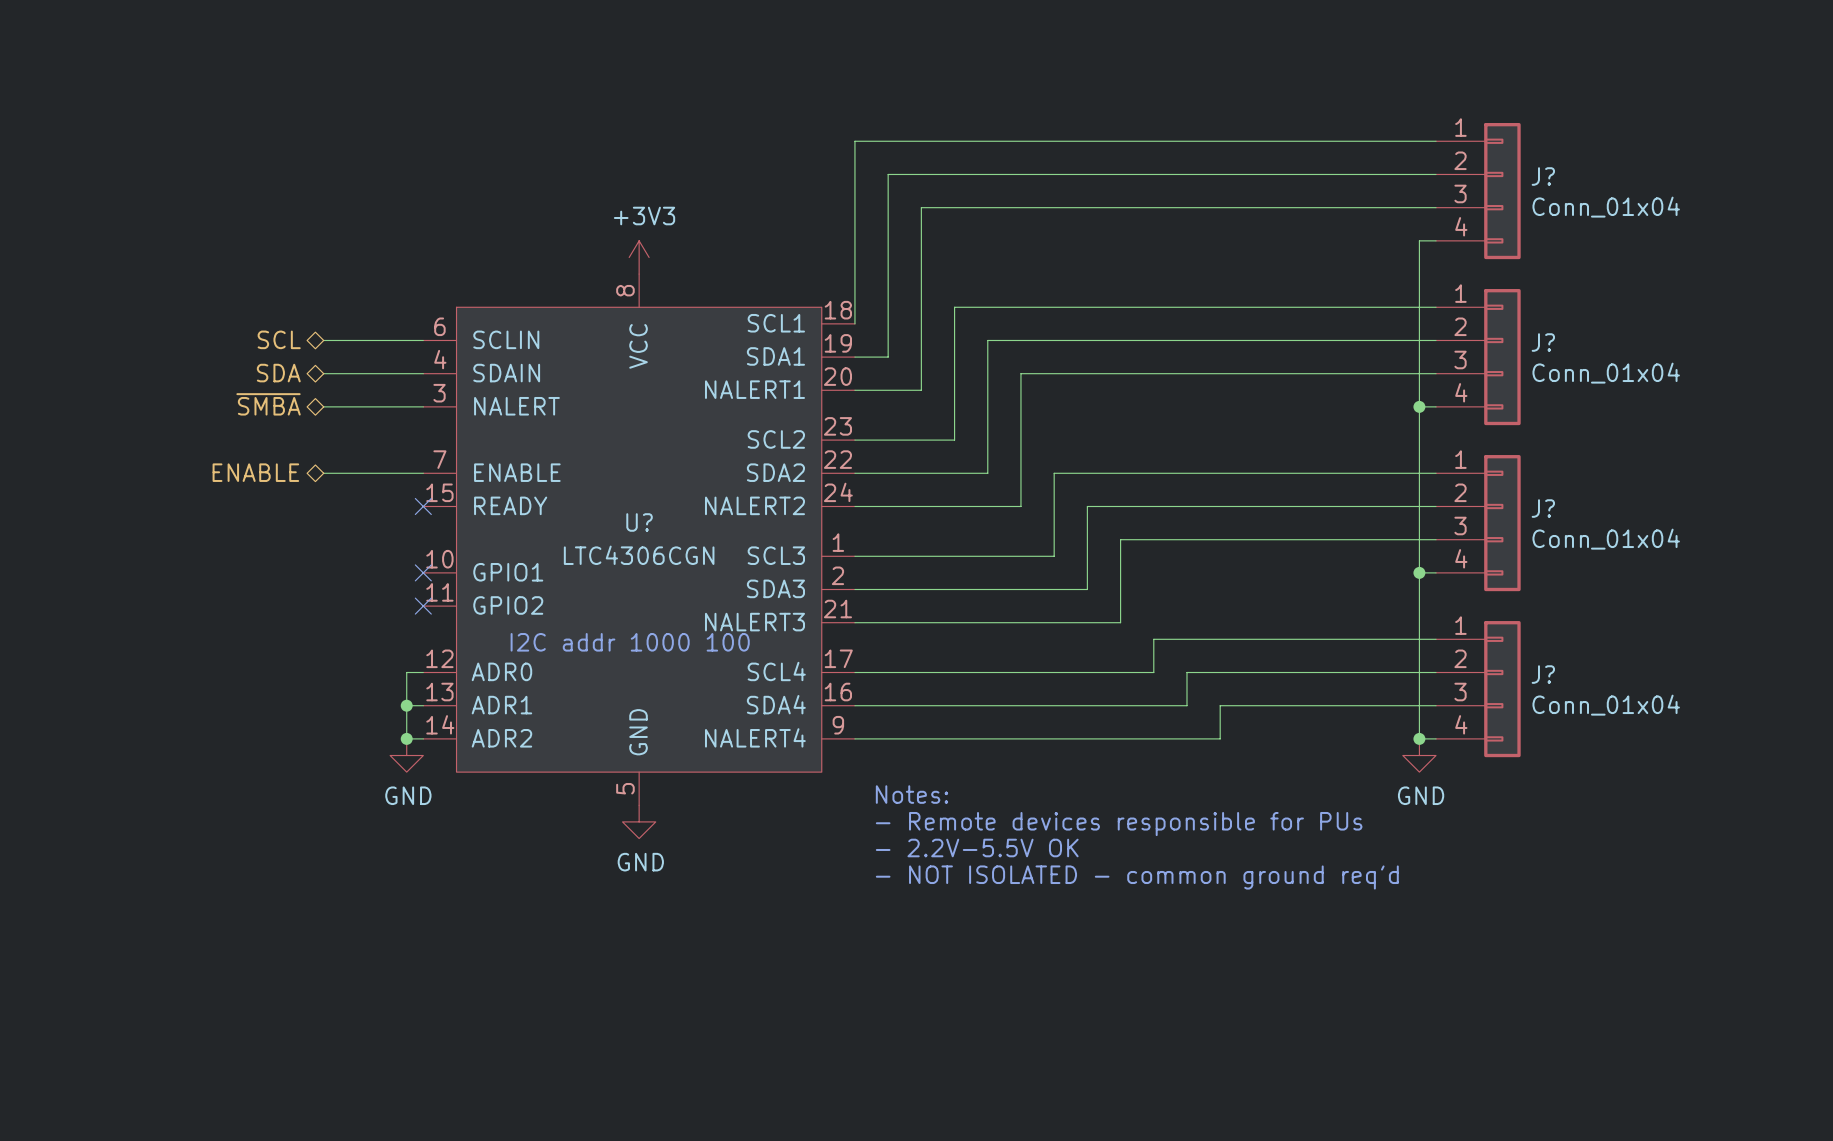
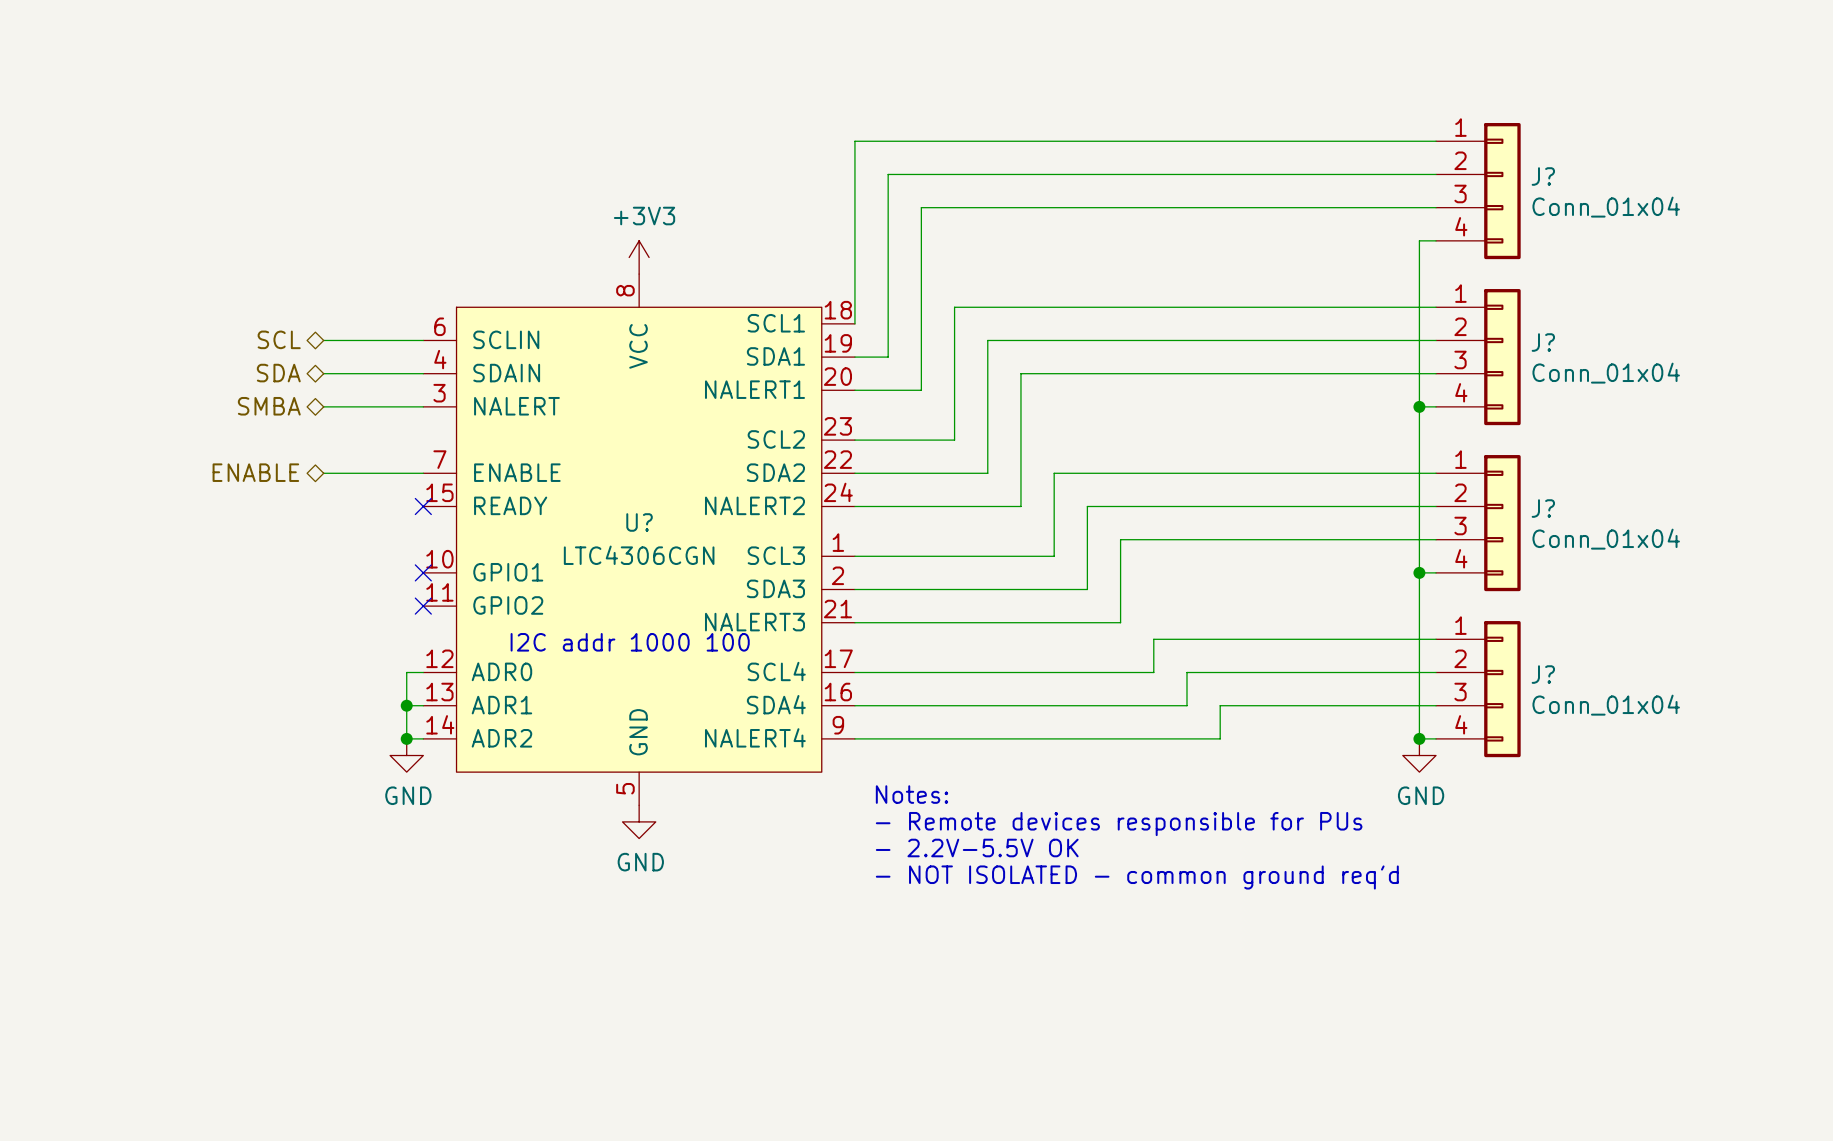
hierarchical label: ~{SMBA} (268, 404) -> SMBA (269, 406)

